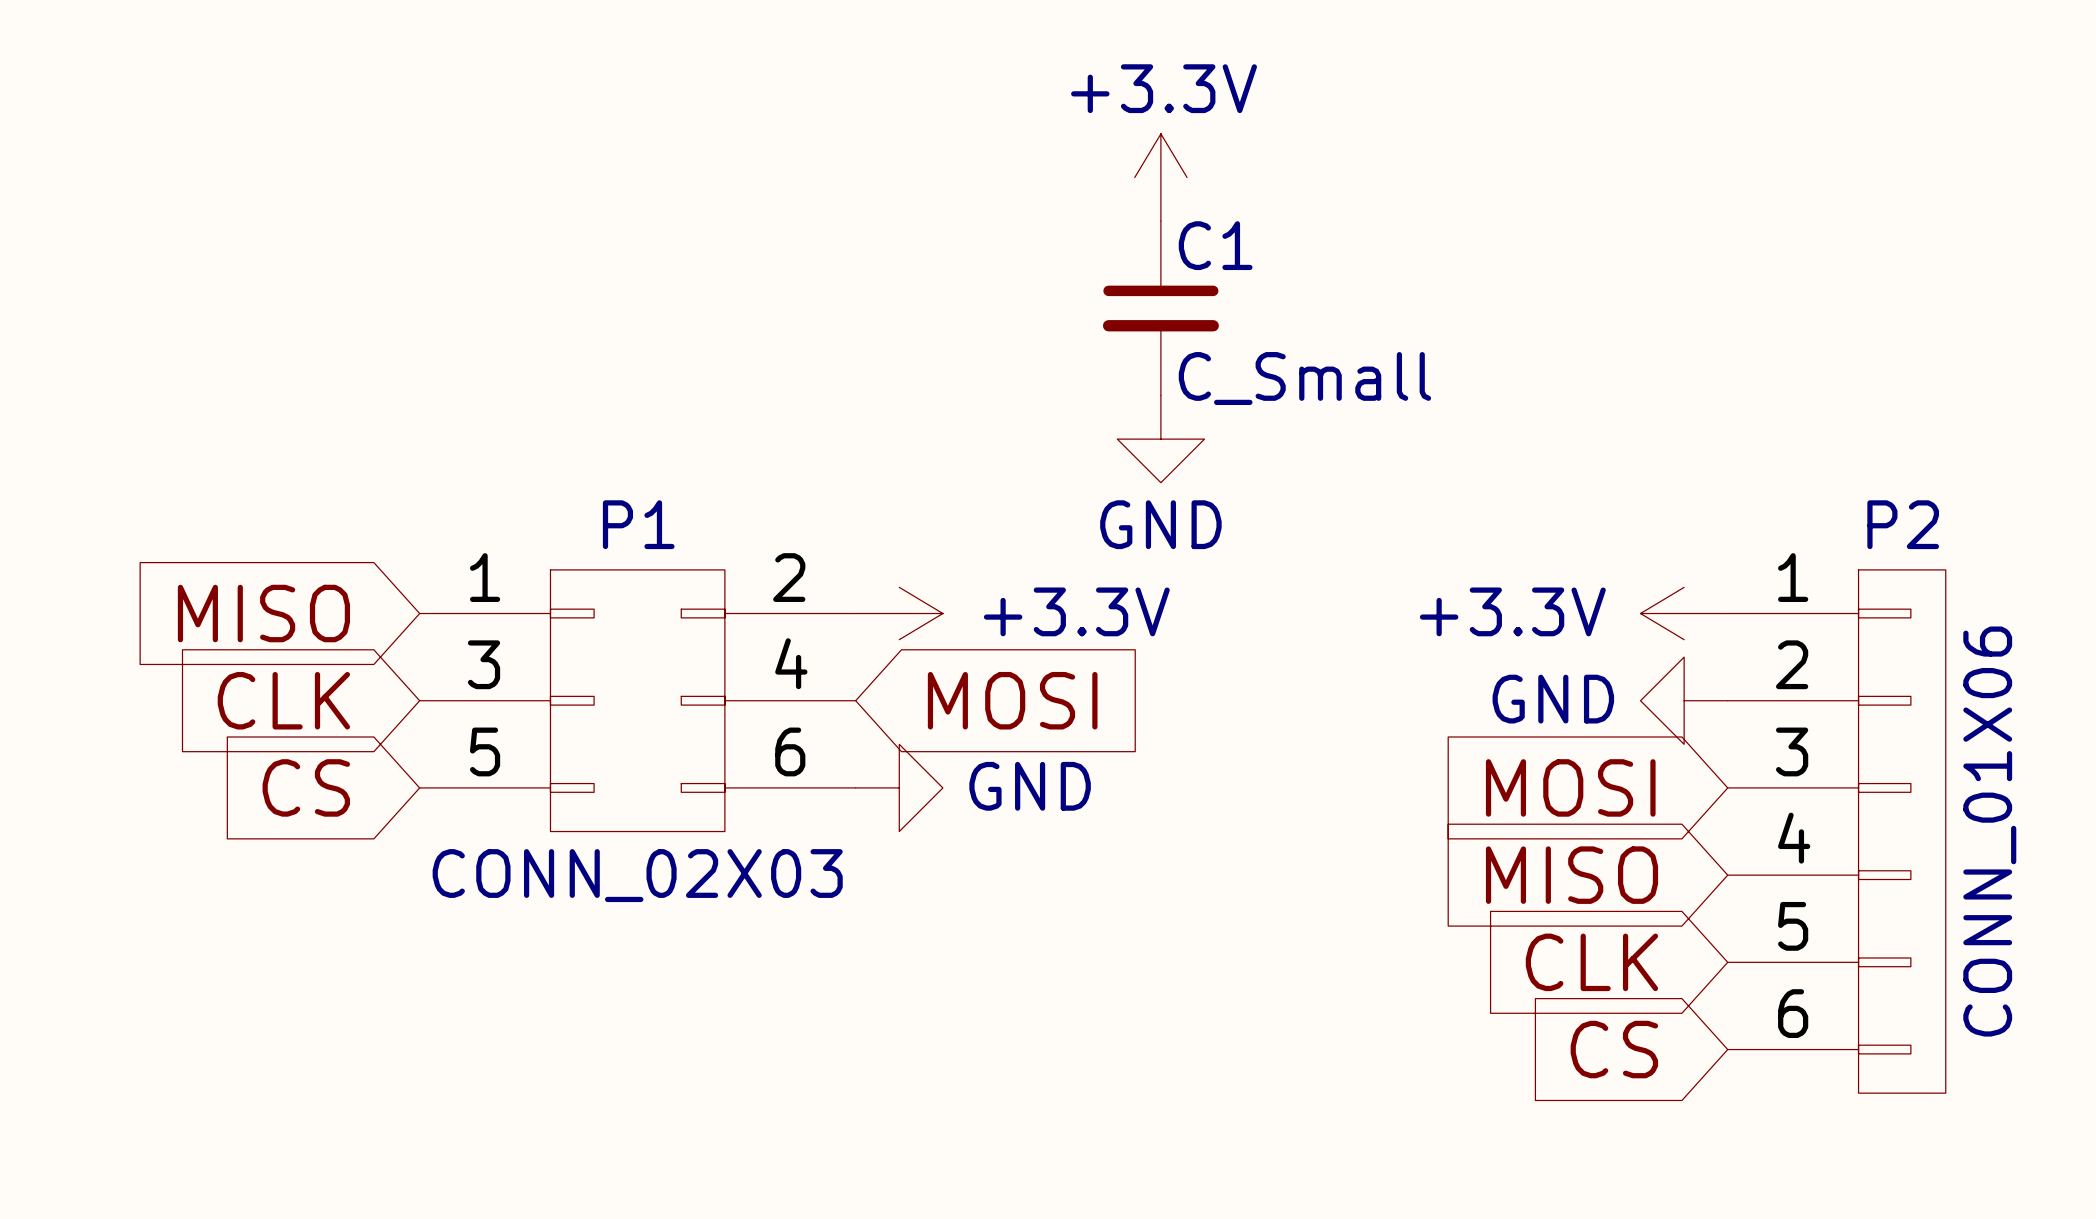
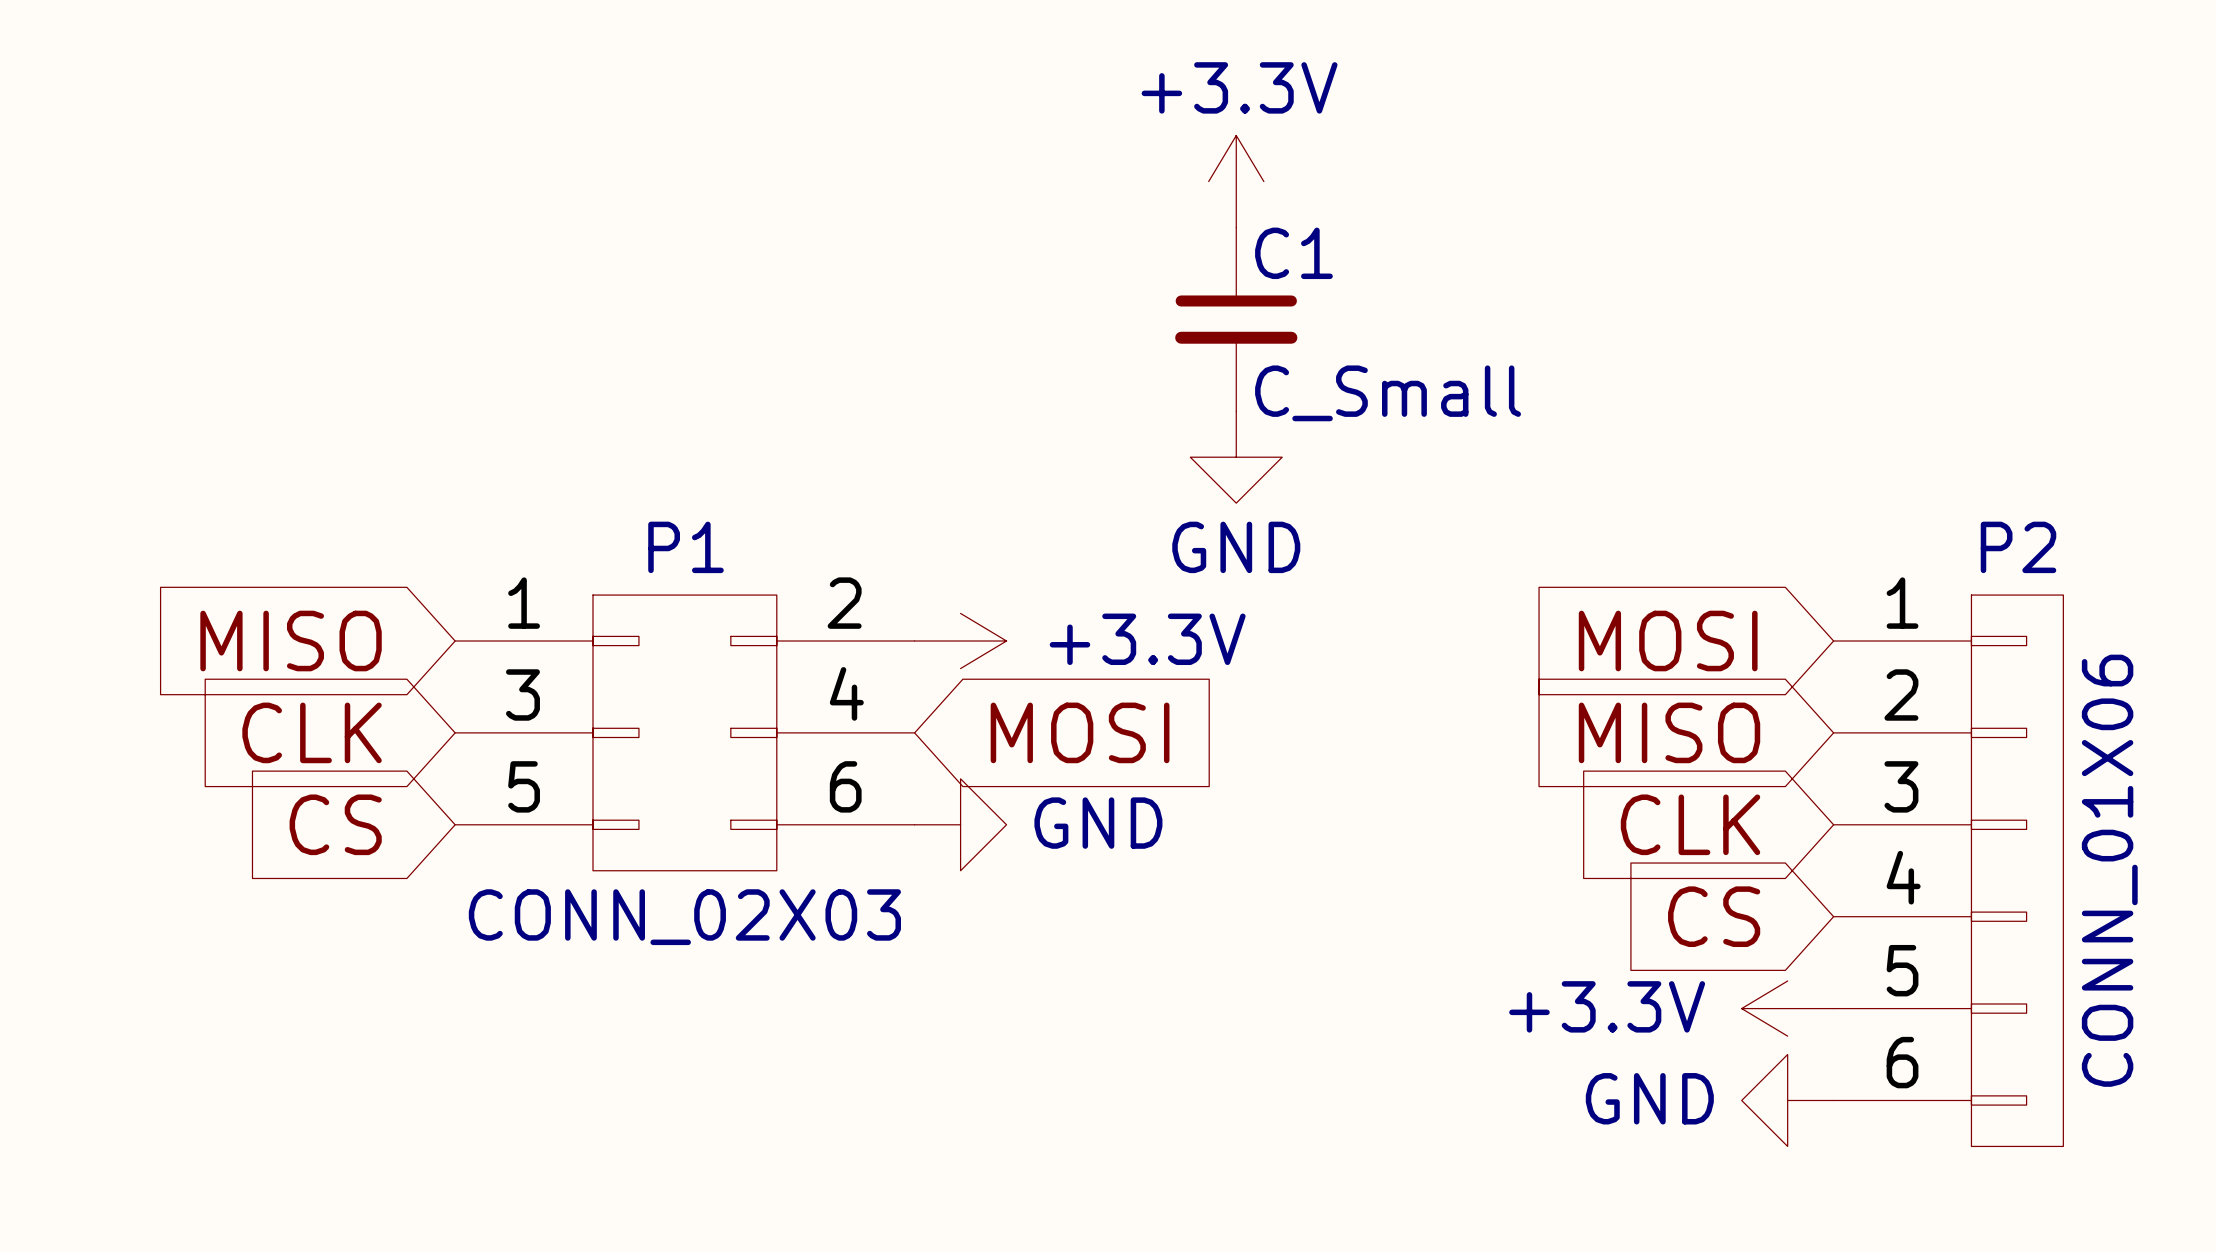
global label: none -> MOSI (1668, 641)
power symbol position: +3.3V (1684, 613) -> +3.3V (1787, 1008)
global label: none -> MISO (1669, 732)
power symbol position: GND (1684, 700) -> GND (1787, 1100)
global label: MOSI (1570, 787) -> CLK (1690, 824)
global label: MISO (1572, 875) -> CS (1714, 916)
global label: CLK (1591, 962) -> none
global label: CS (1614, 1049) -> none

